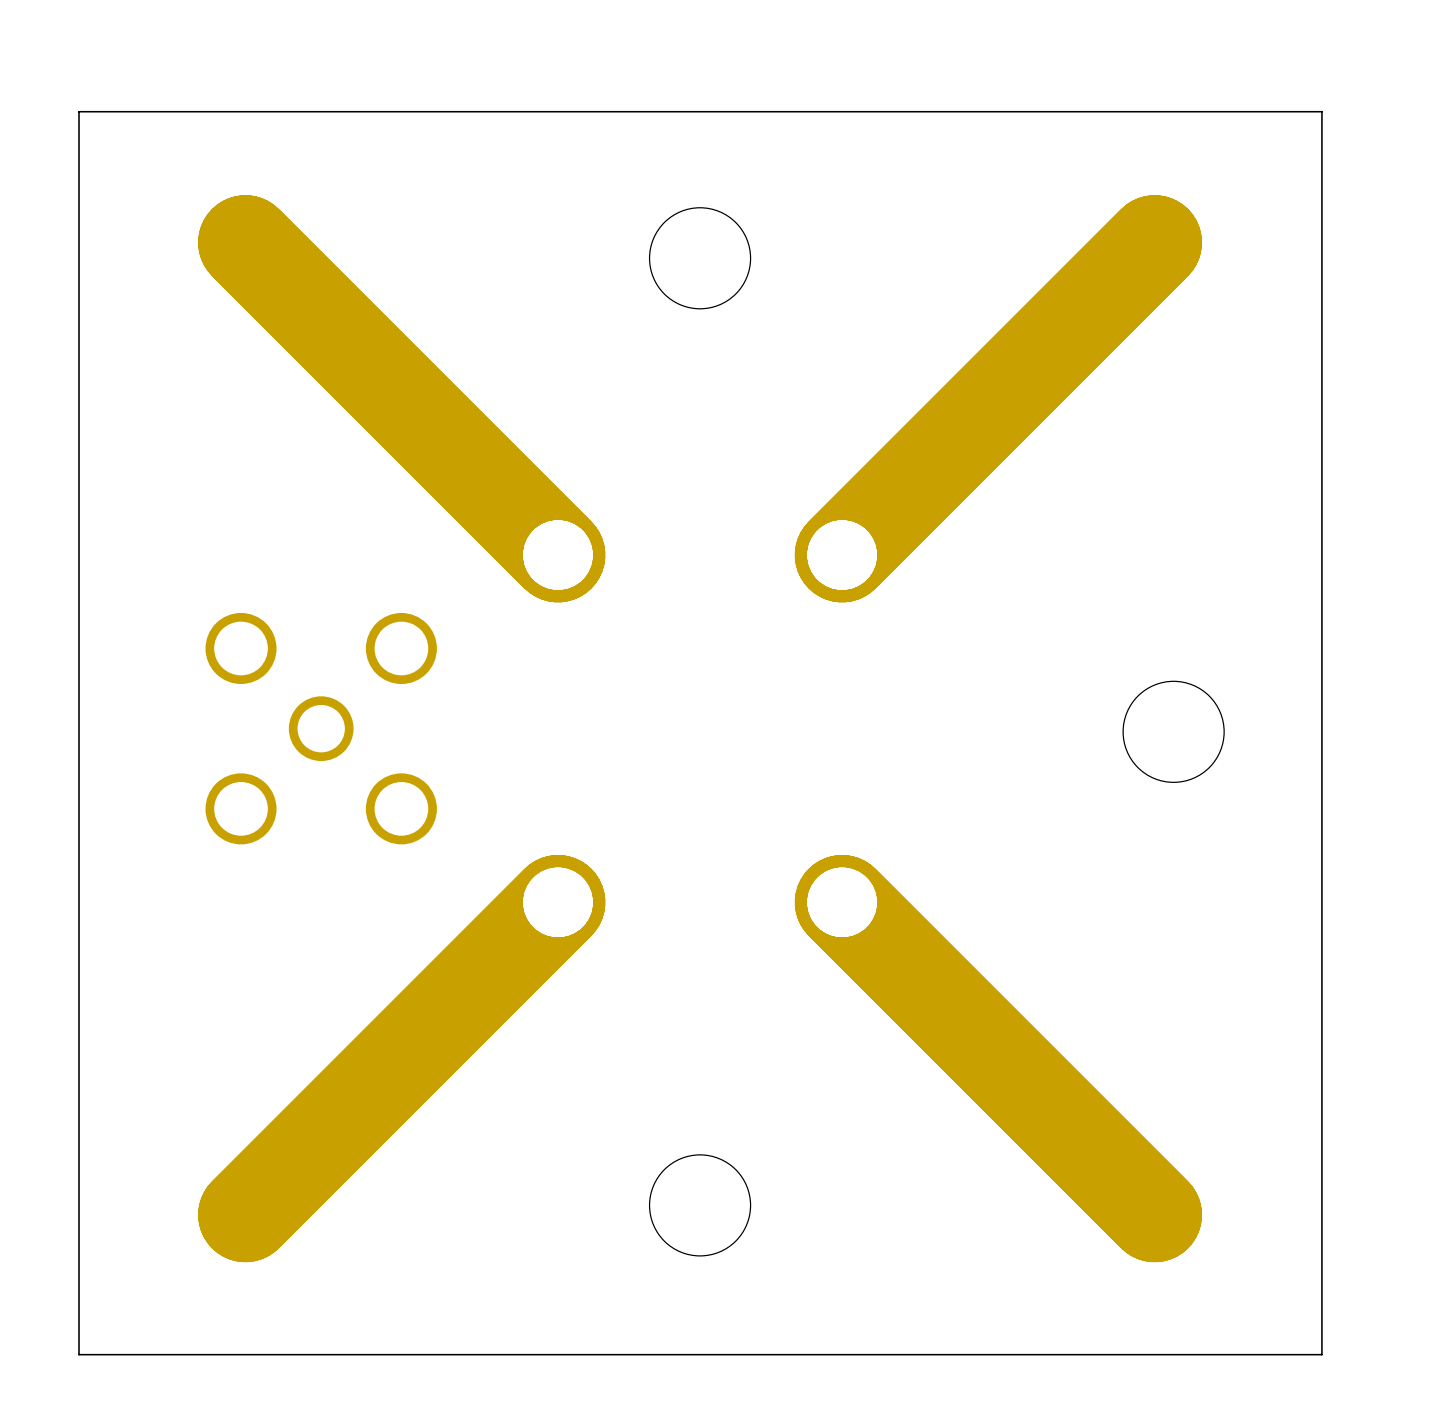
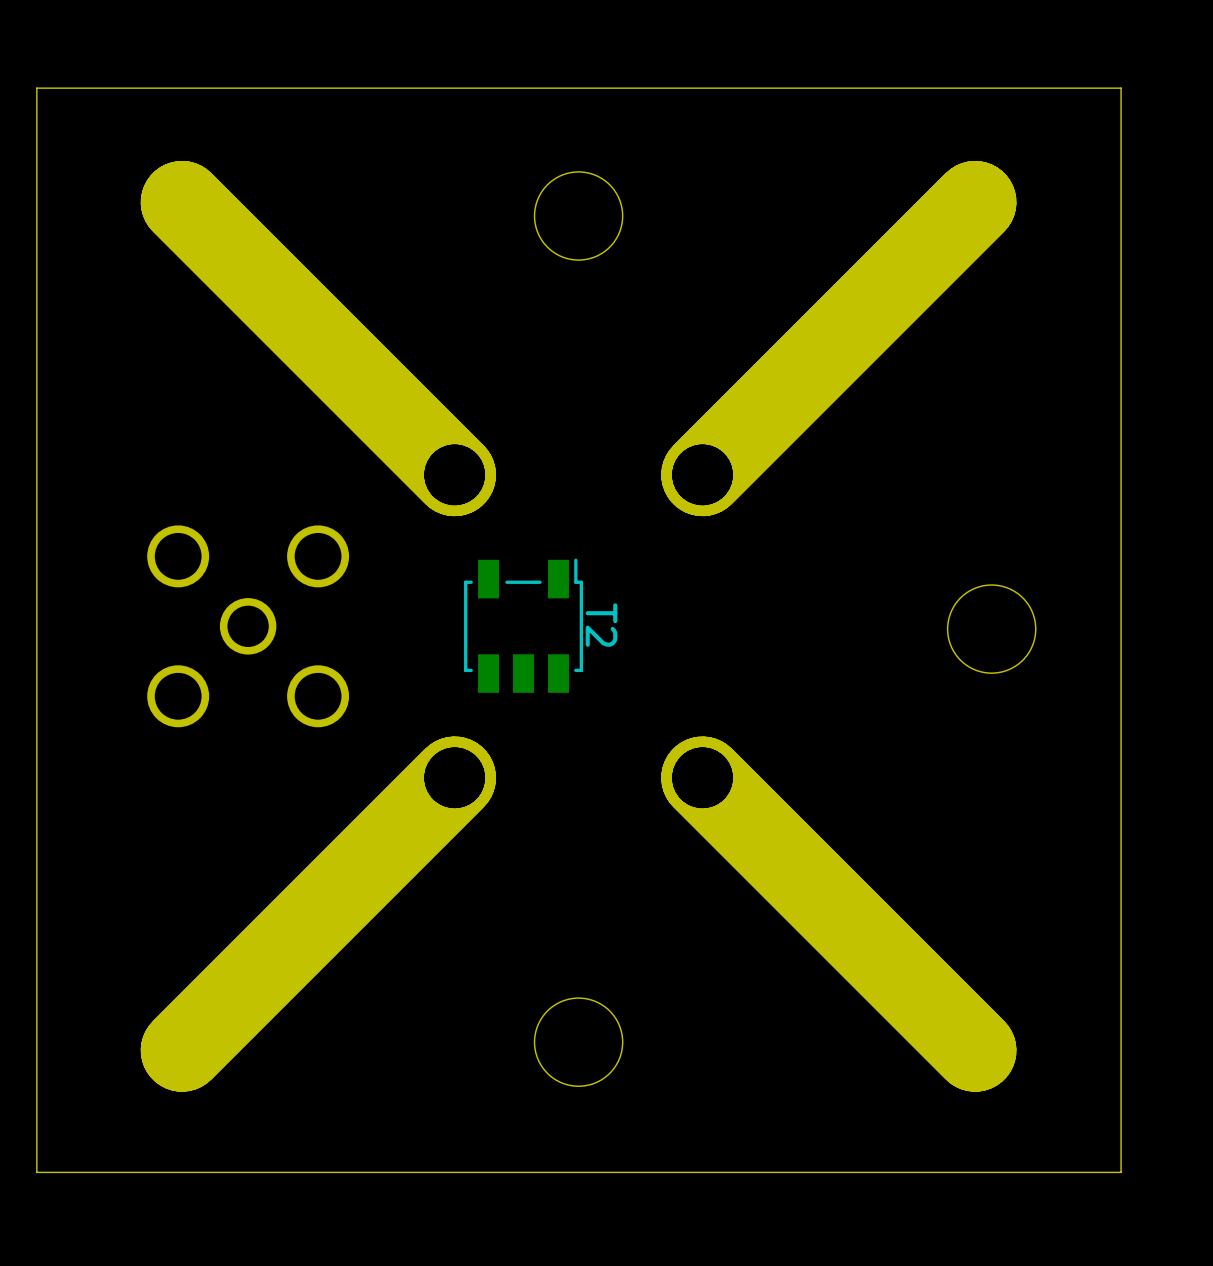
T2: none -> (523, 625)

